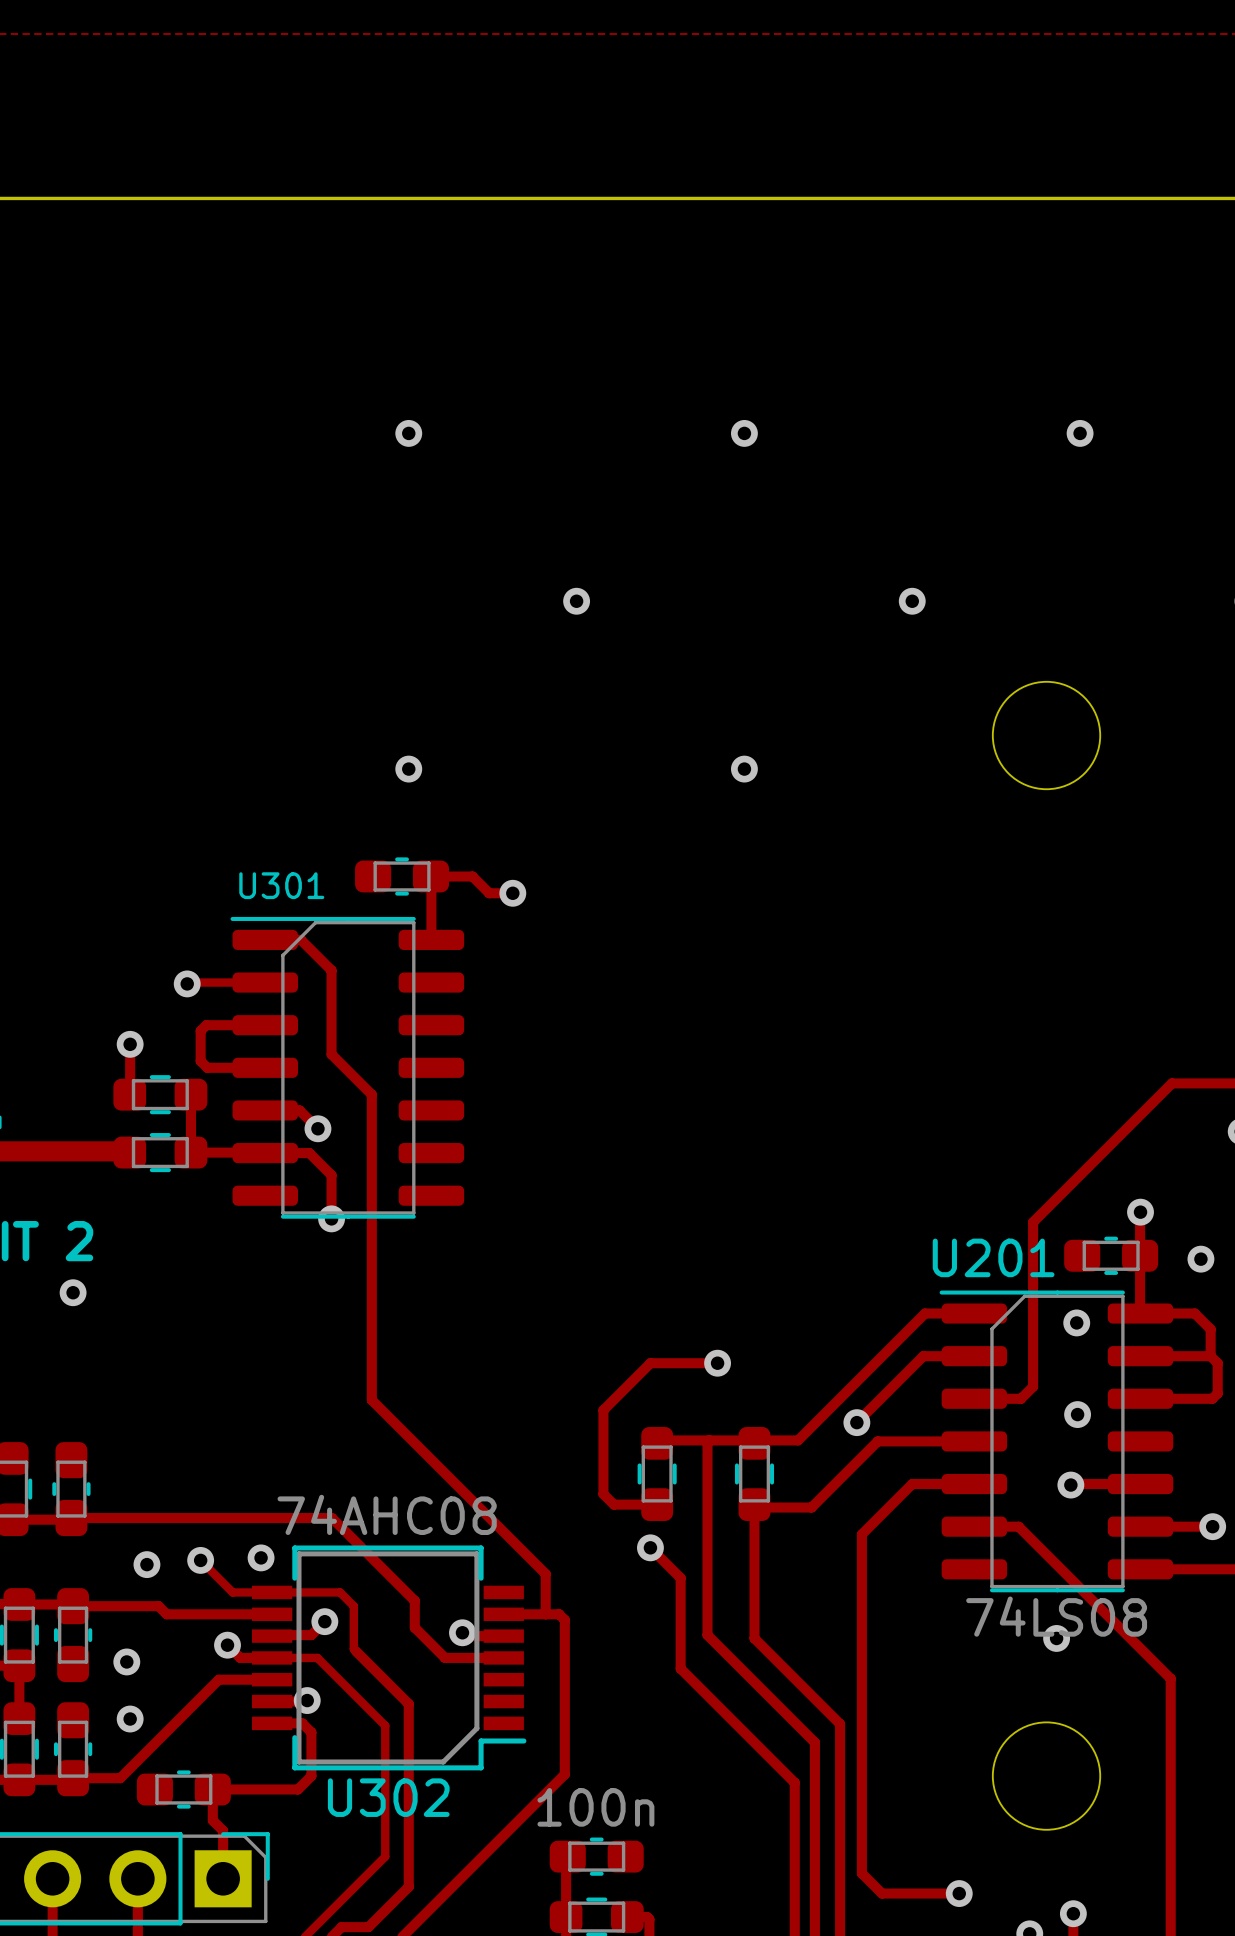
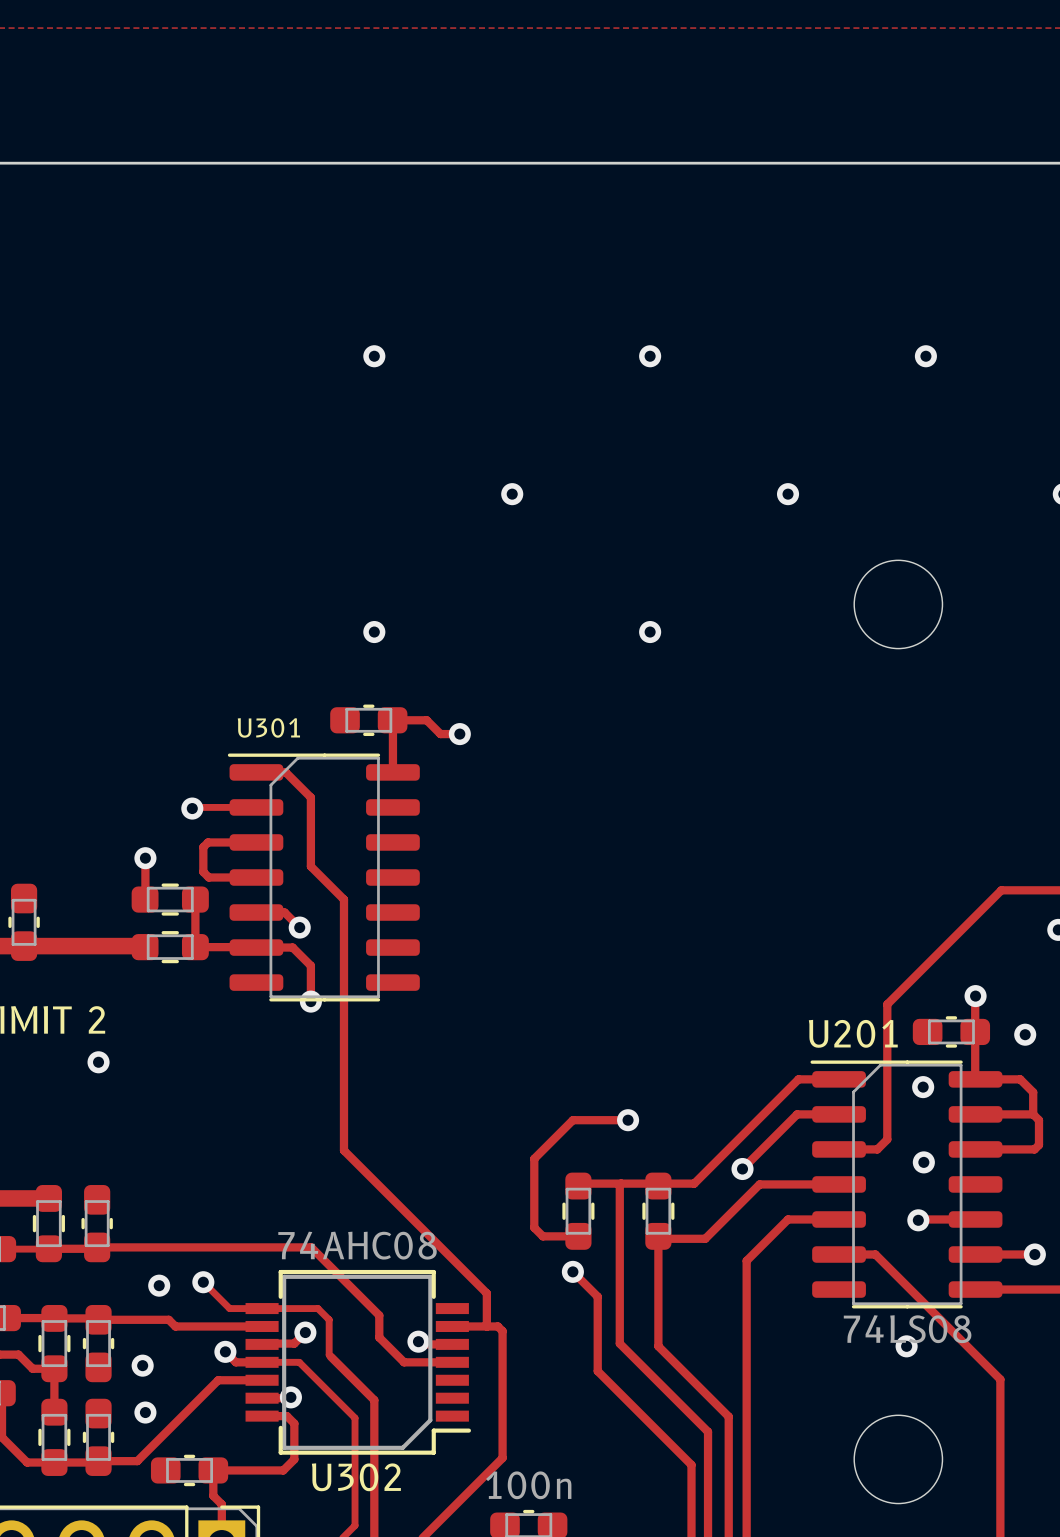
via: (261, 1557) -> none

